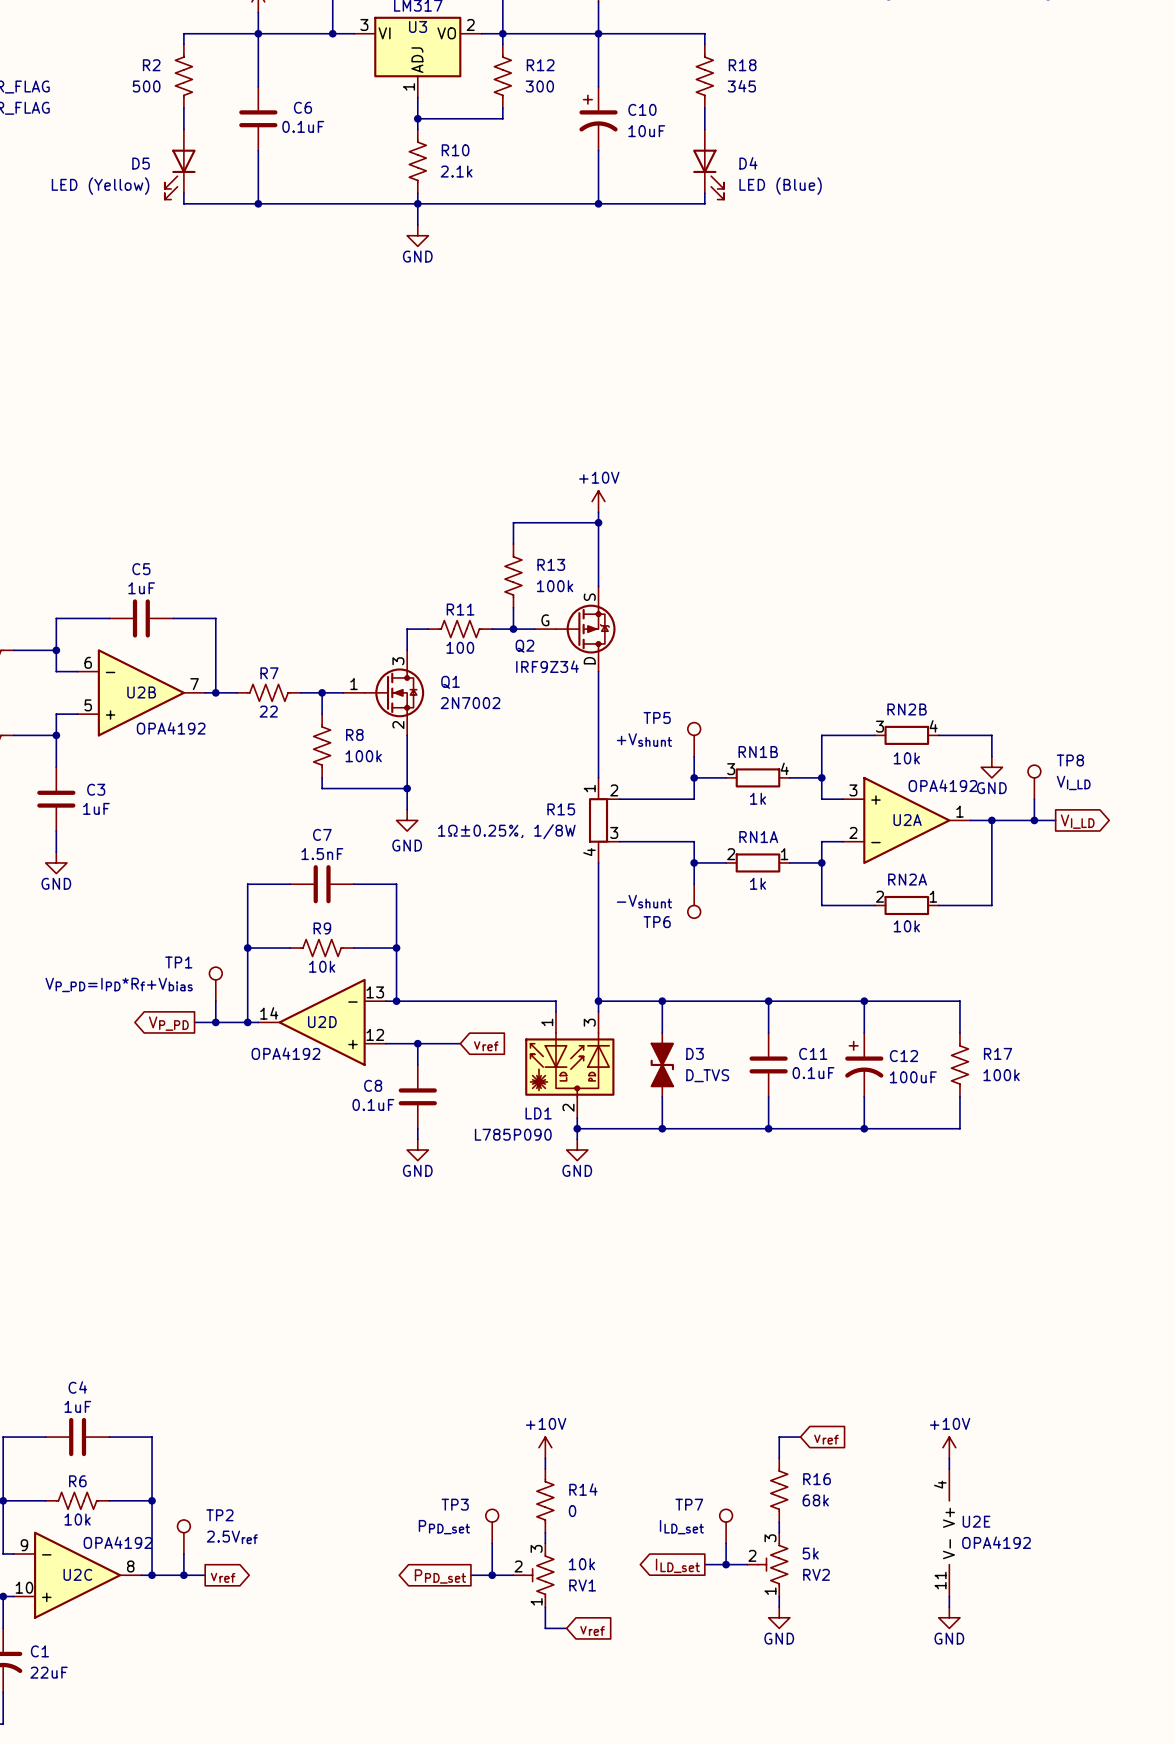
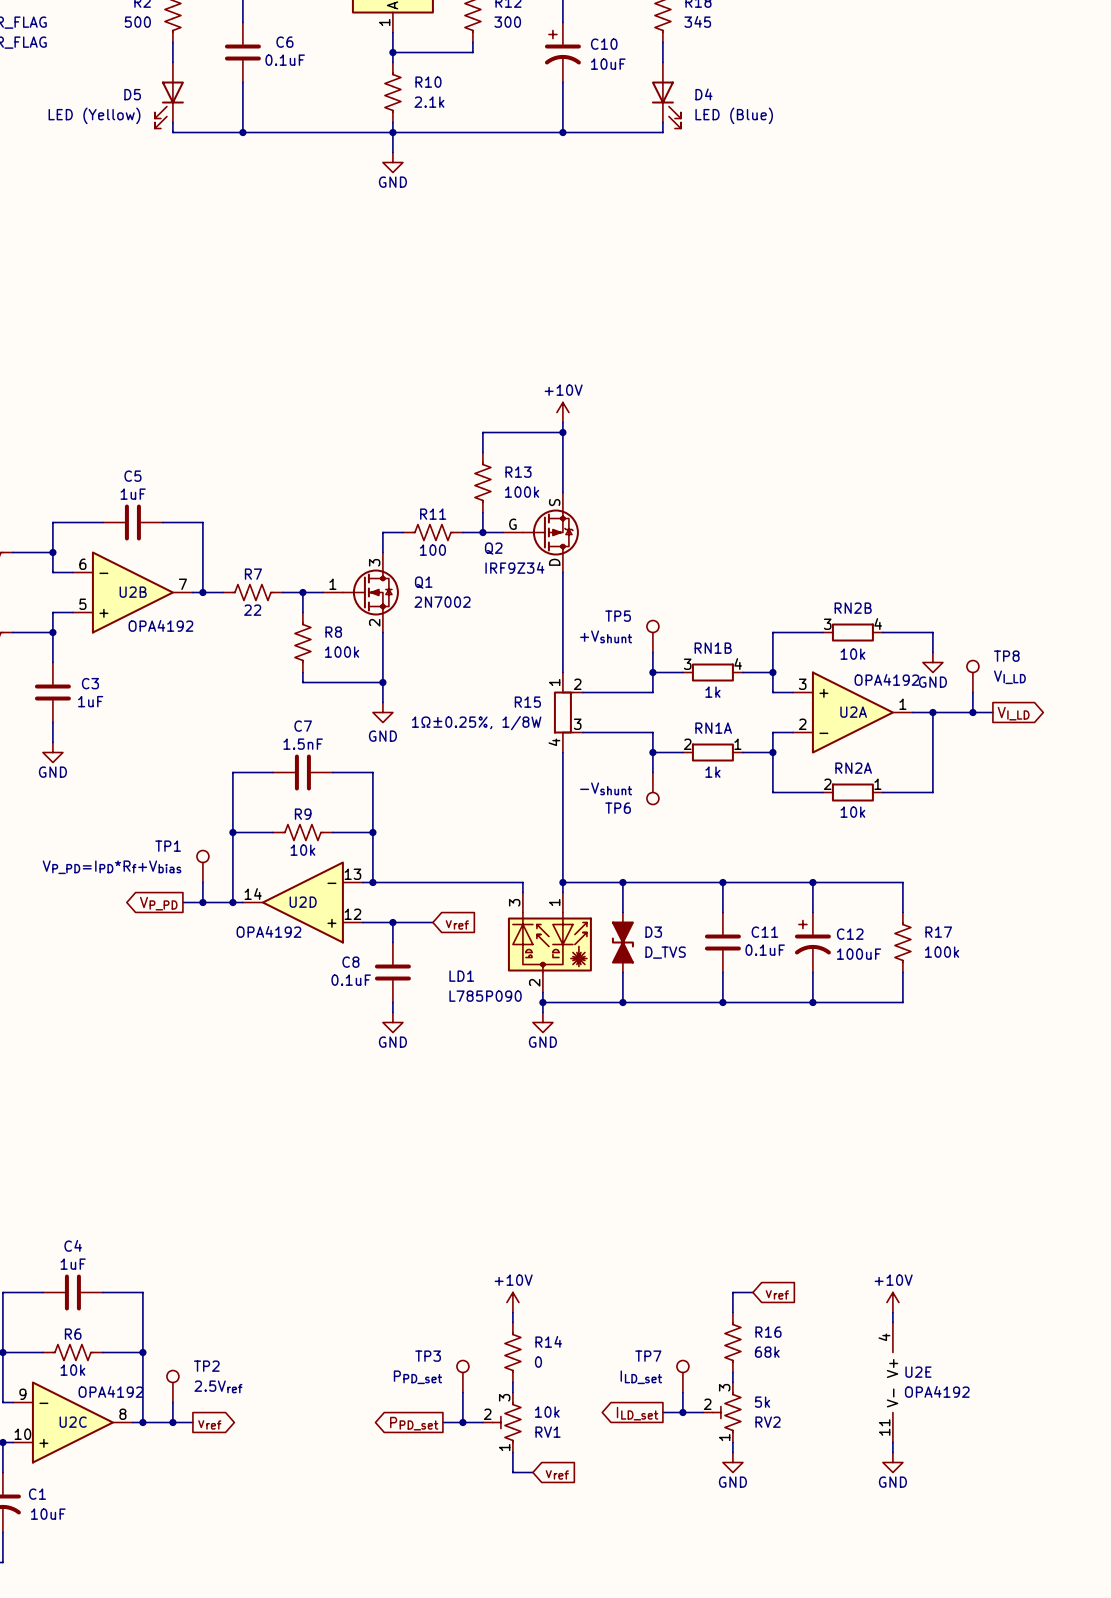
LD1 flip: as is (569, 1064) -> left-right (549, 942)
LD1 name position: LD1 (538, 1113) -> LD1 (461, 976)
C1 value: 22uF (49, 1672) -> 10uF (48, 1514)

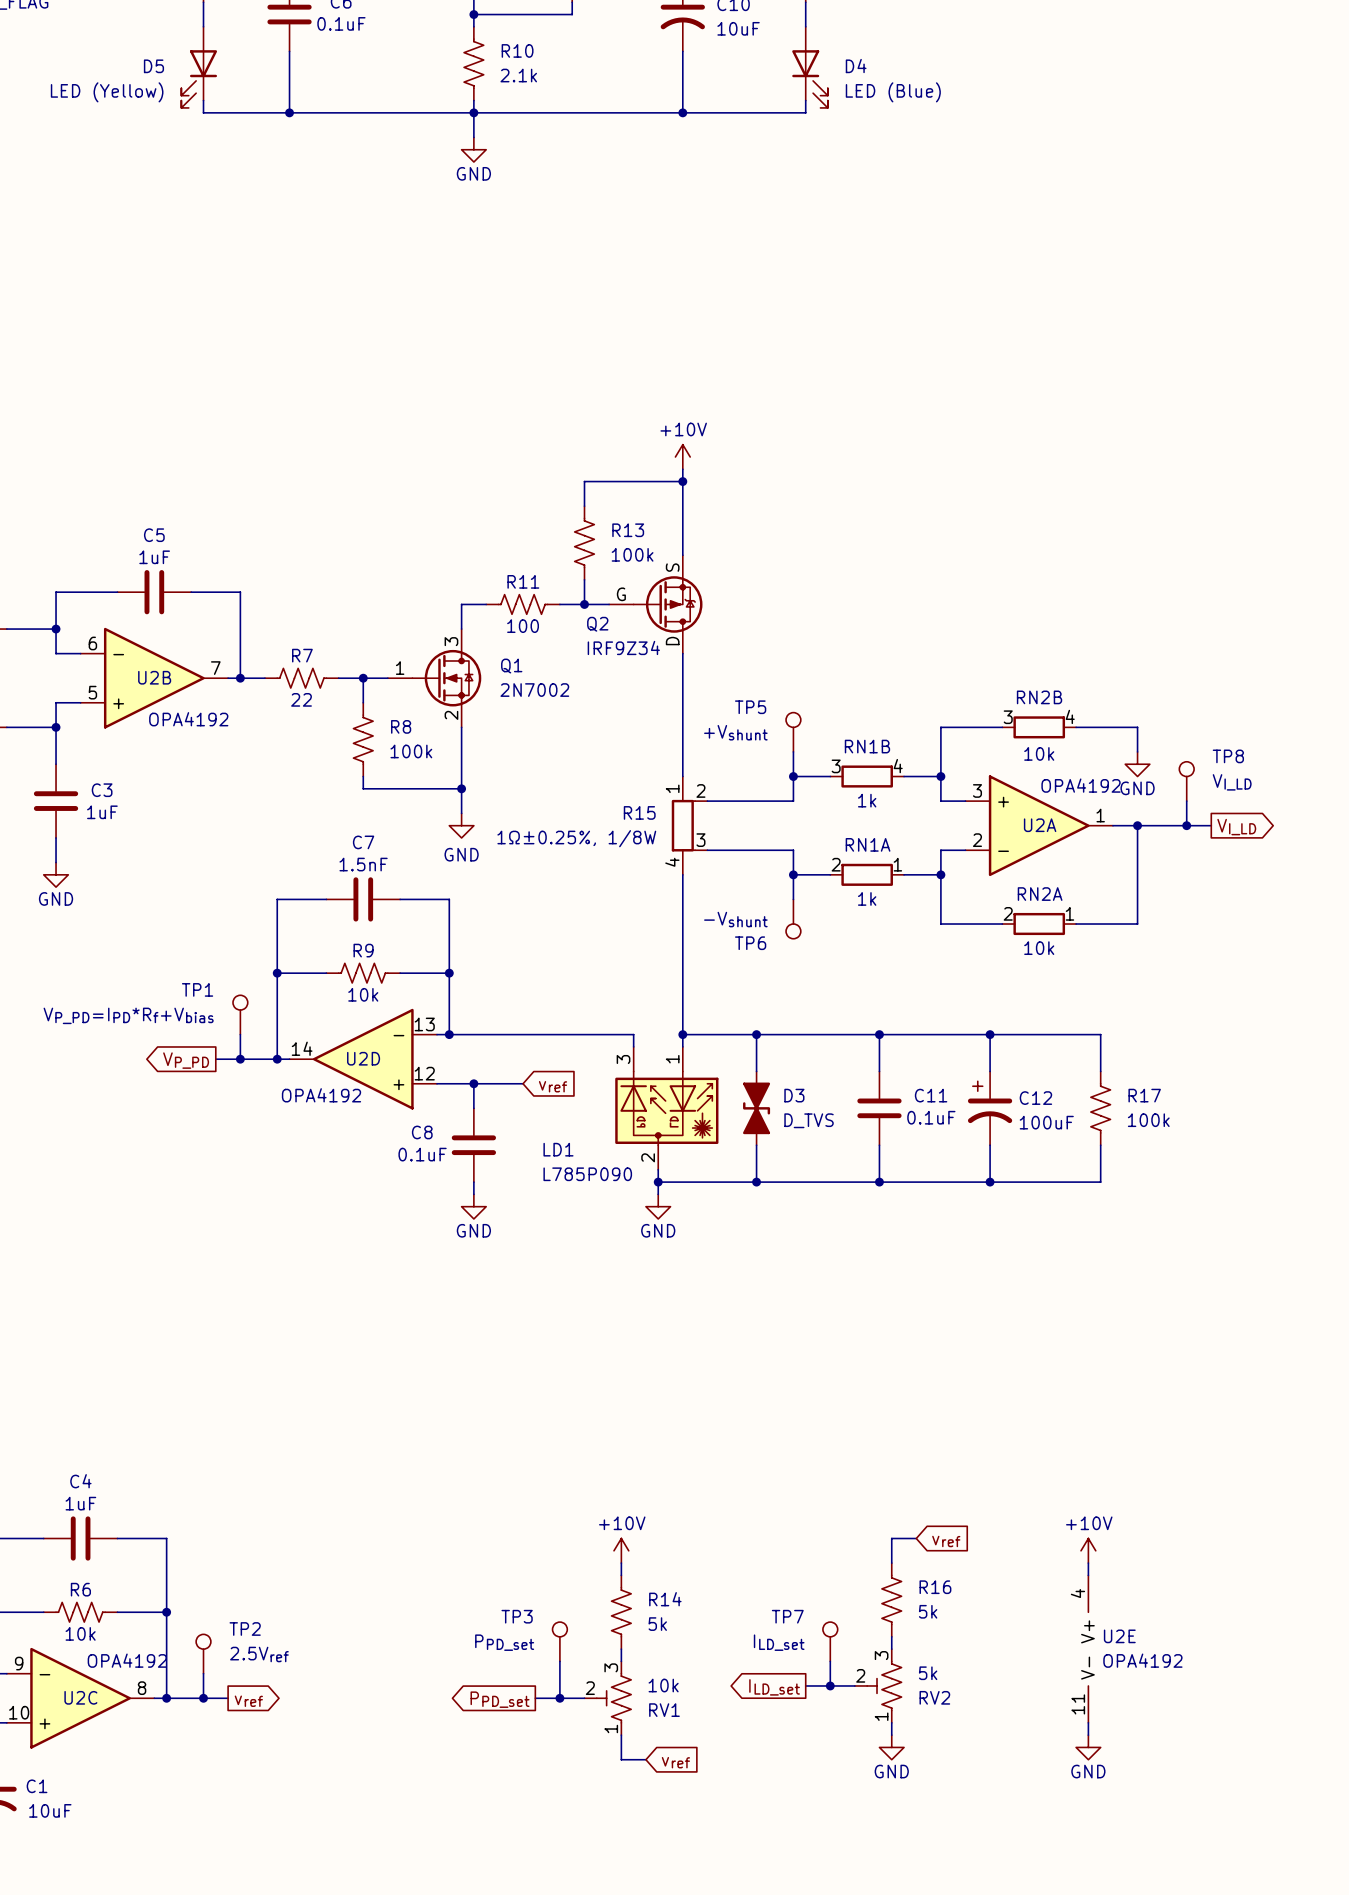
R16 value: 68k (767, 1352) -> 5k (928, 1611)
R14 value: 0 (538, 1362) -> 5k (657, 1624)

